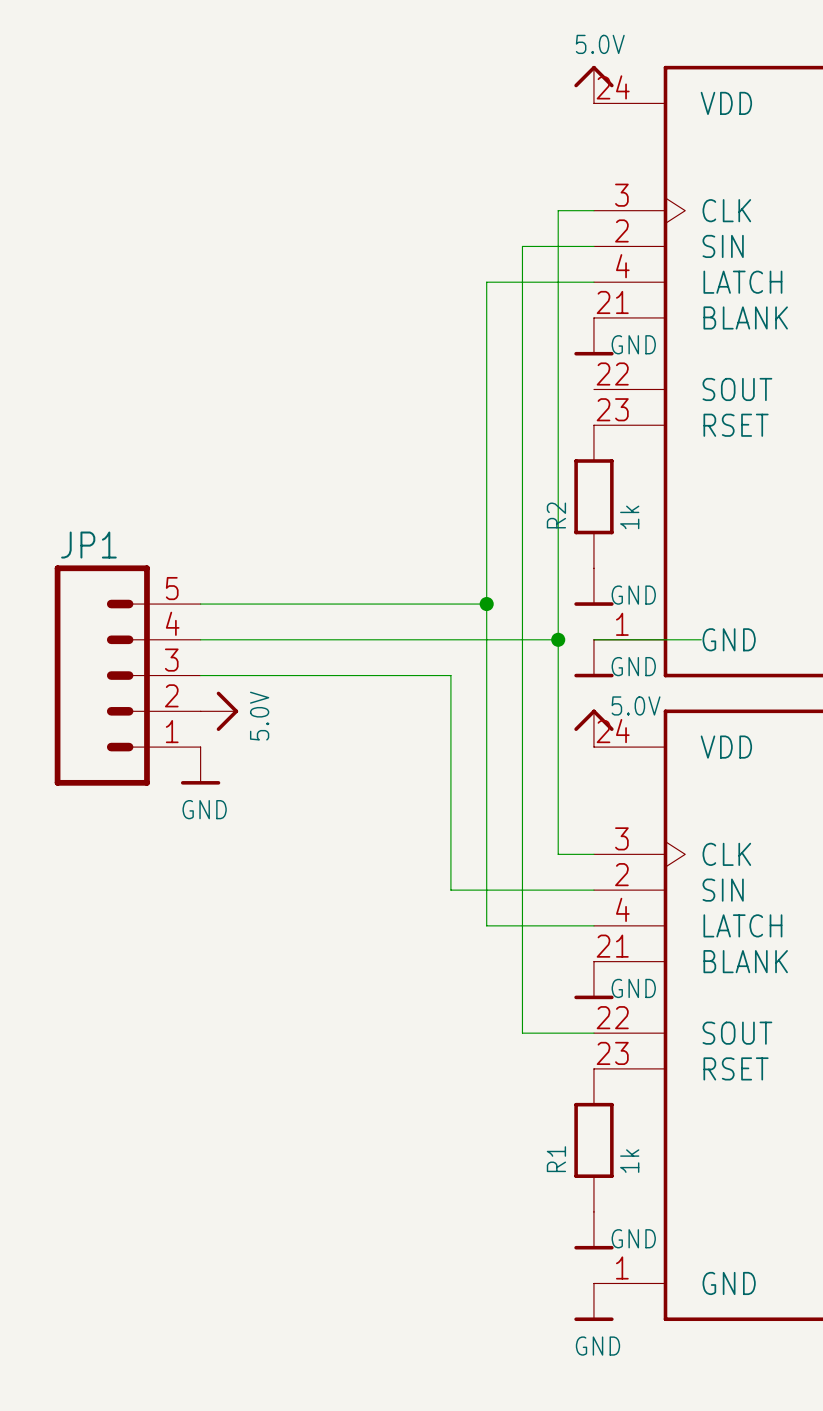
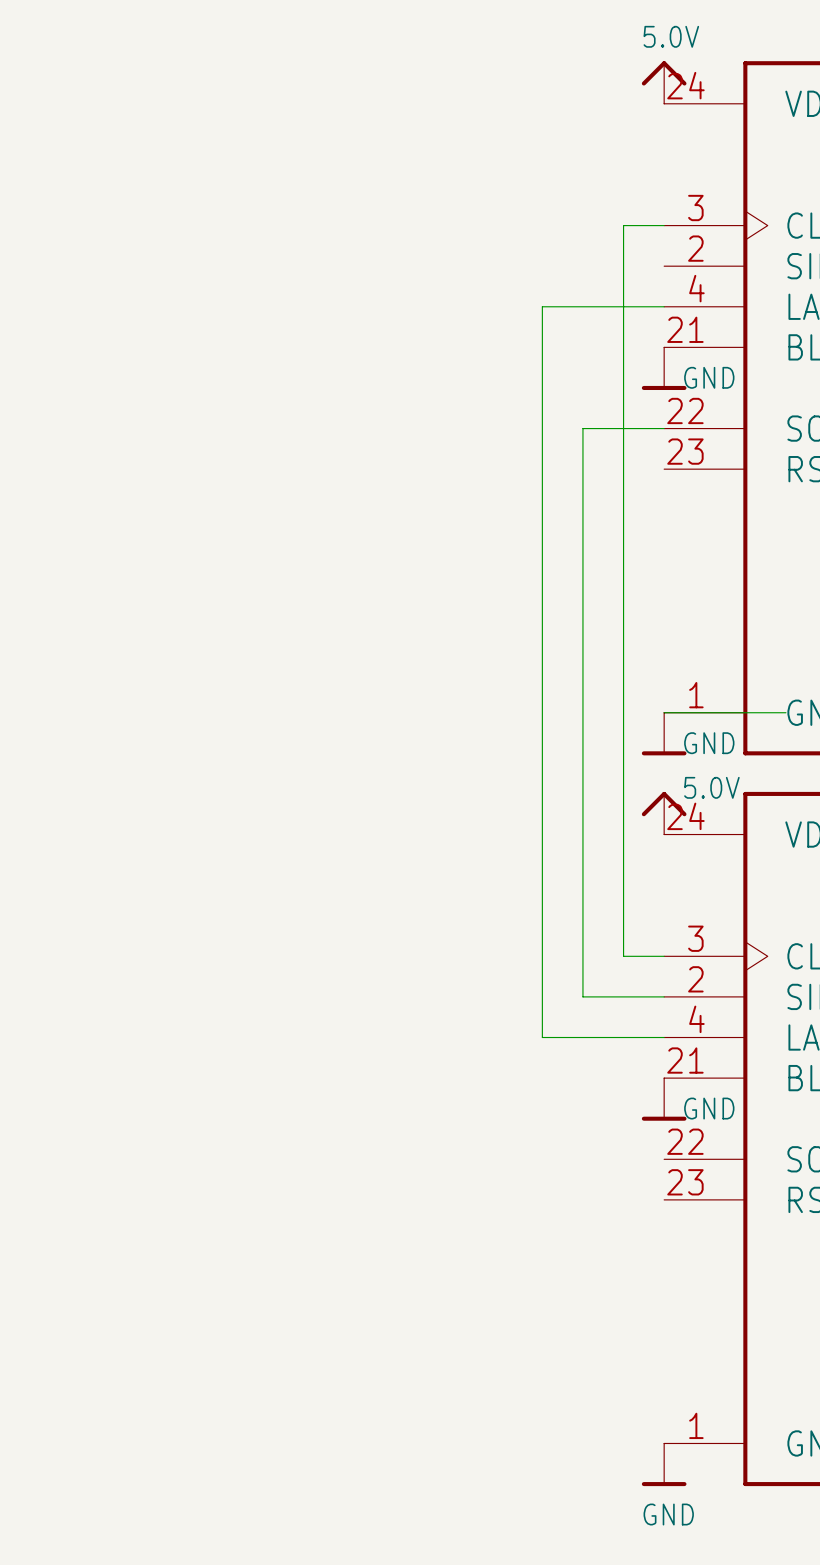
wire: (593, 246) (522, 246) (522, 389) -> (664, 428) (582, 428)
R2: 1k (593, 496) -> none
power symbol: GND (593, 587) -> none
wire: (200, 604) (486, 604) -> none
junction: (486, 604) -> none
wire: (200, 639) (558, 639) -> none
junction: (558, 639) -> none
JP1: (127, 675) -> none
wire: (200, 675) (450, 675) (450, 890) (522, 890) (522, 1033) (593, 1033) -> none
power symbol: 5.0V (219, 711) -> none
power symbol: GND (200, 765) -> none
R1: 1k (593, 1140) -> none
power symbol: GND (593, 1230) -> none

